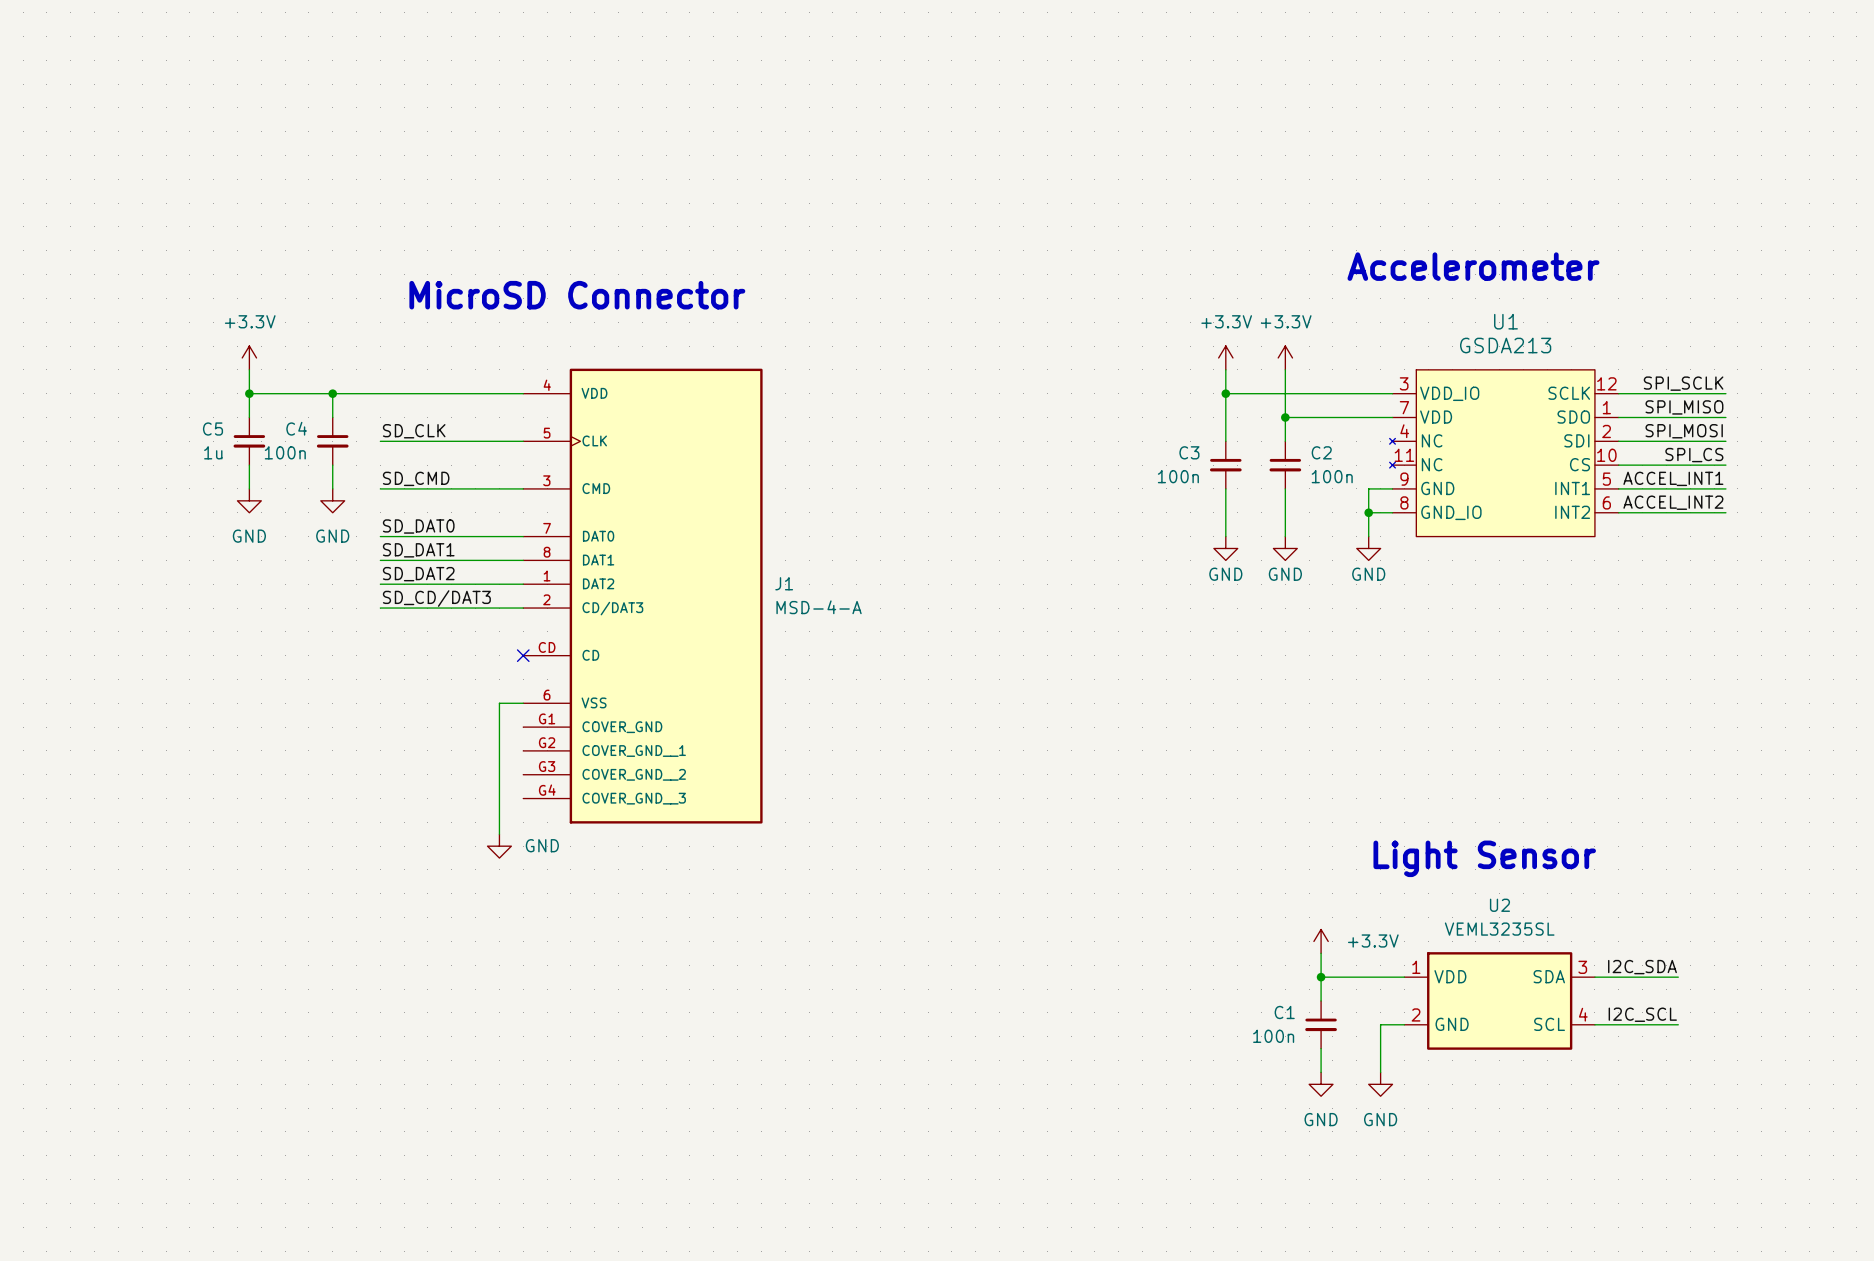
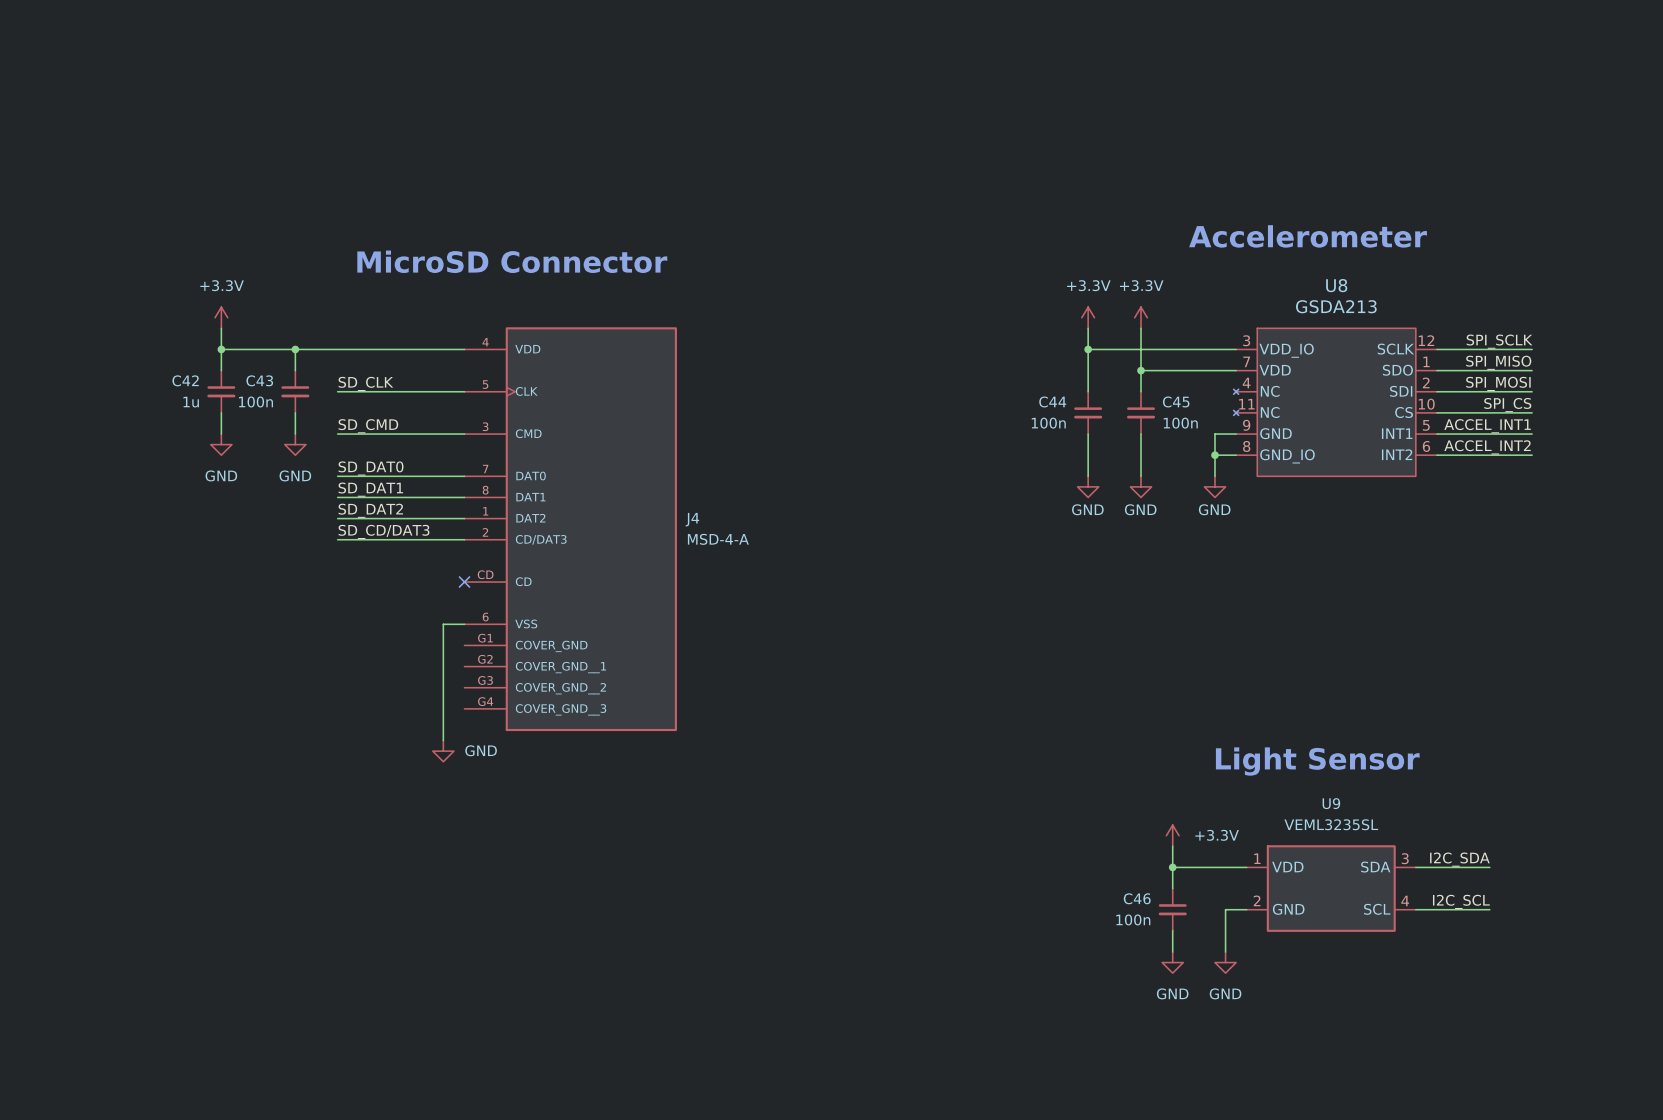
U1 name: U1 (1505, 321) -> U8 (1336, 285)
C4 name: C4 (296, 428) -> C43 (259, 380)
C5 name: C5 (213, 429) -> C42 (185, 380)
C3 name: C3 (1189, 452) -> C44 (1052, 401)
C2 name: C2 (1321, 452) -> C45 (1176, 401)
J1 name: J1 (784, 583) -> J4 (692, 519)
U2 name: U2 (1499, 905) -> U9 (1331, 803)
C1 name: C1 (1284, 1012) -> C46 (1137, 898)

